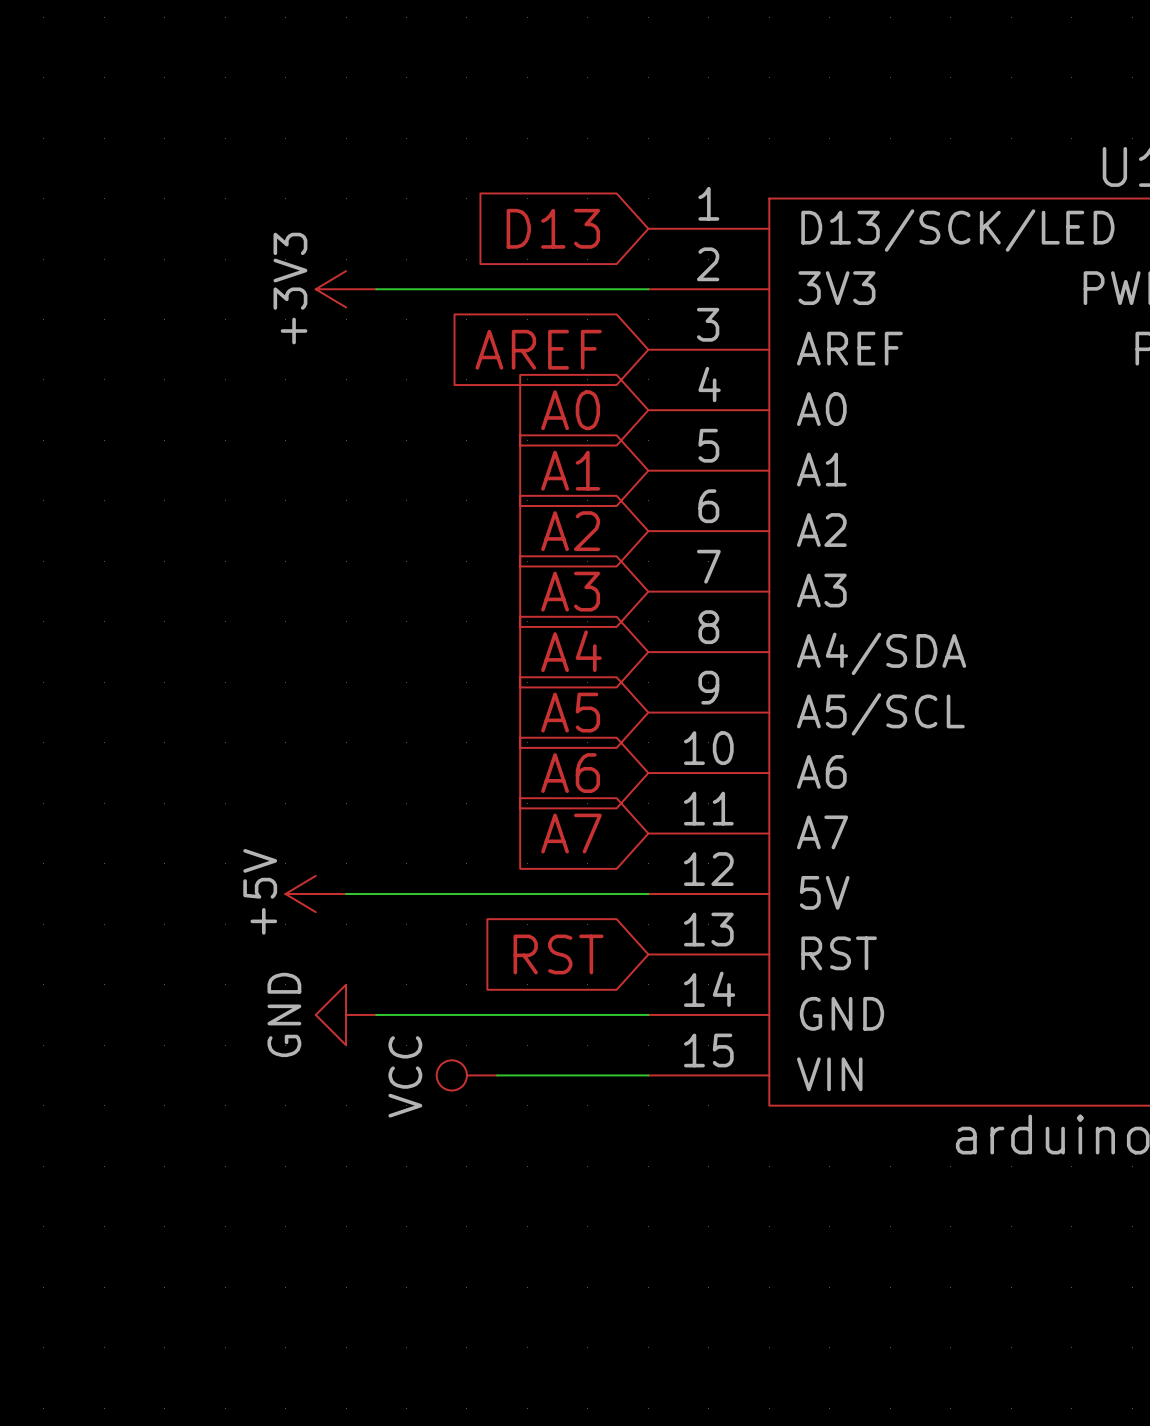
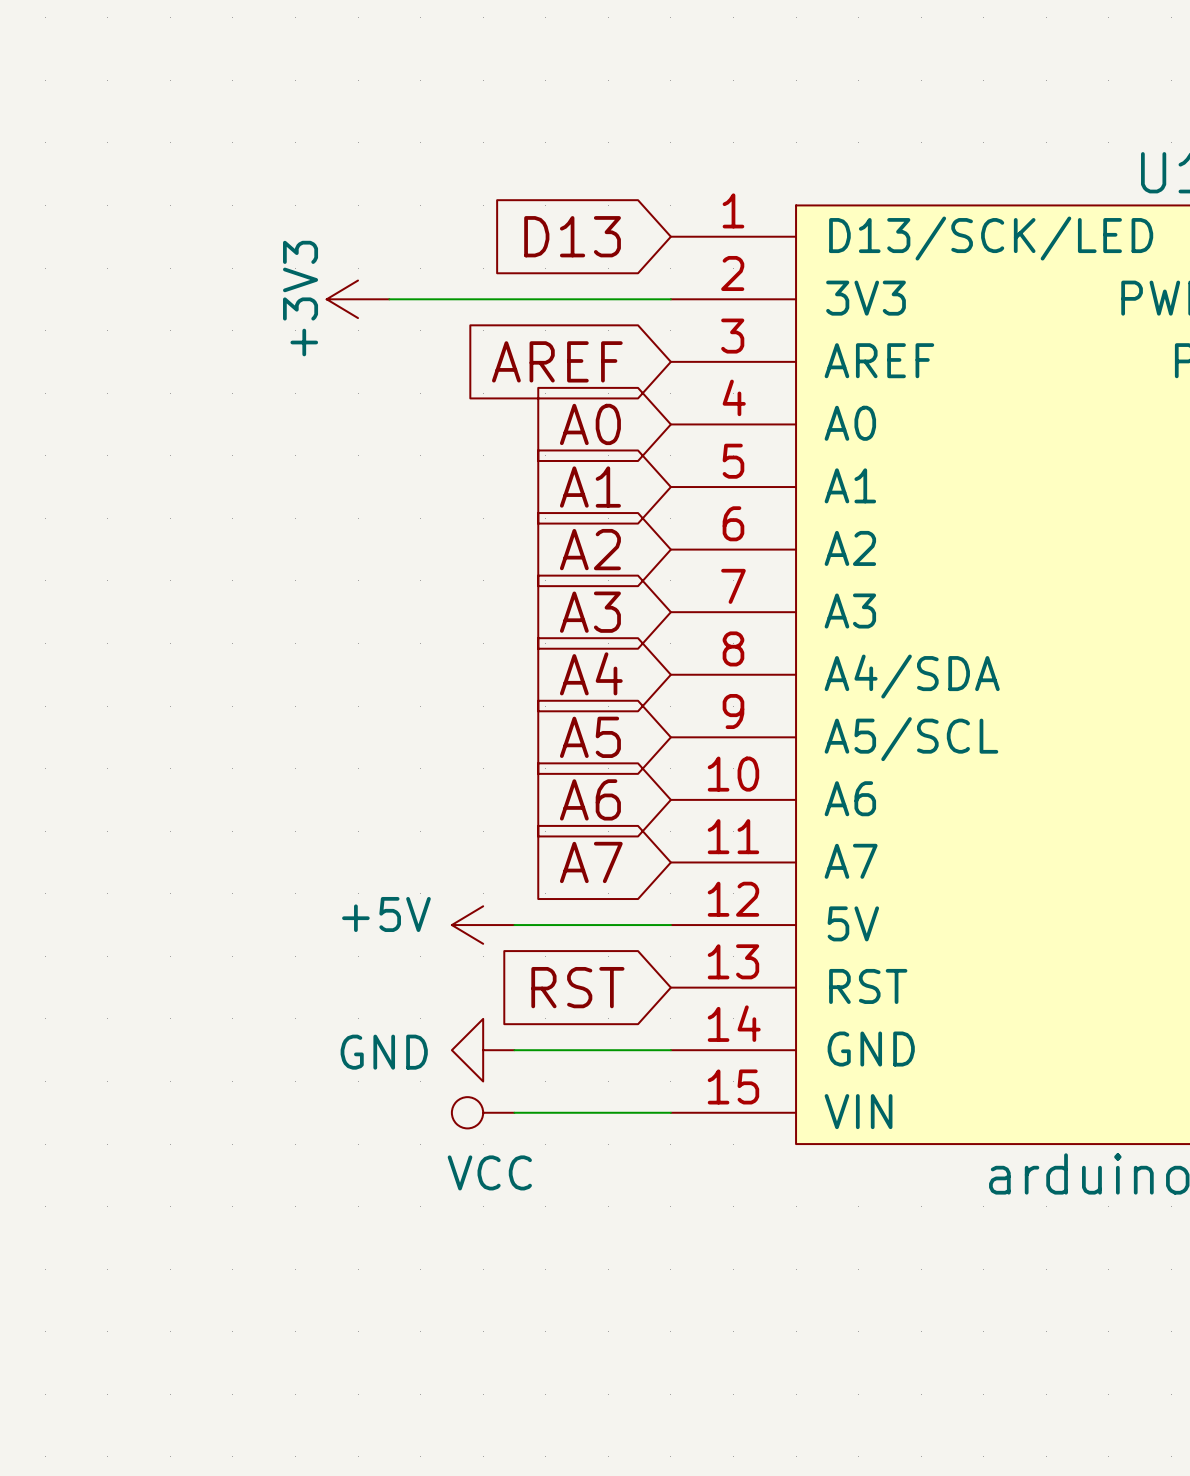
power symbol text rotation: 0° (260, 891) -> 90° clockwise (386, 914)
power symbol position: +5V (315, 894) -> +5V (483, 925)
wire: (346, 894) (497, 894) -> none
power symbol text rotation: 0° (284, 1014) -> 90° clockwise (384, 1052)
power symbol position: GND (346, 1014) -> GND (483, 1050)
wire: (376, 1014) (497, 1014) -> none
power symbol text rotation: 0° (405, 1076) -> 90° clockwise (489, 1172)

